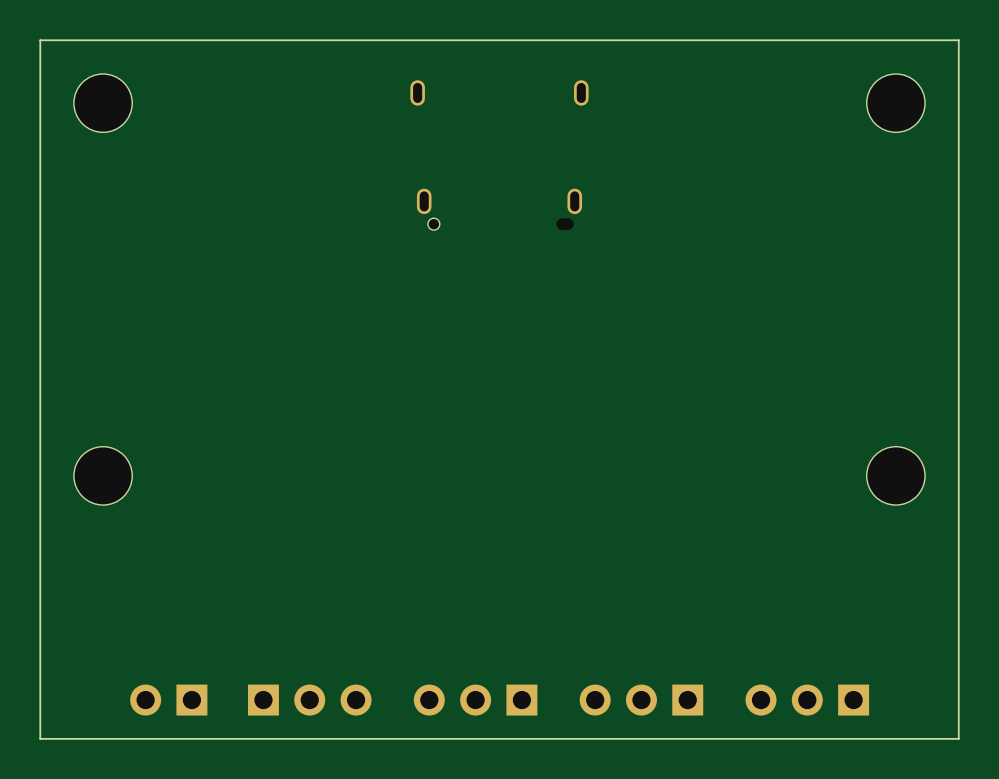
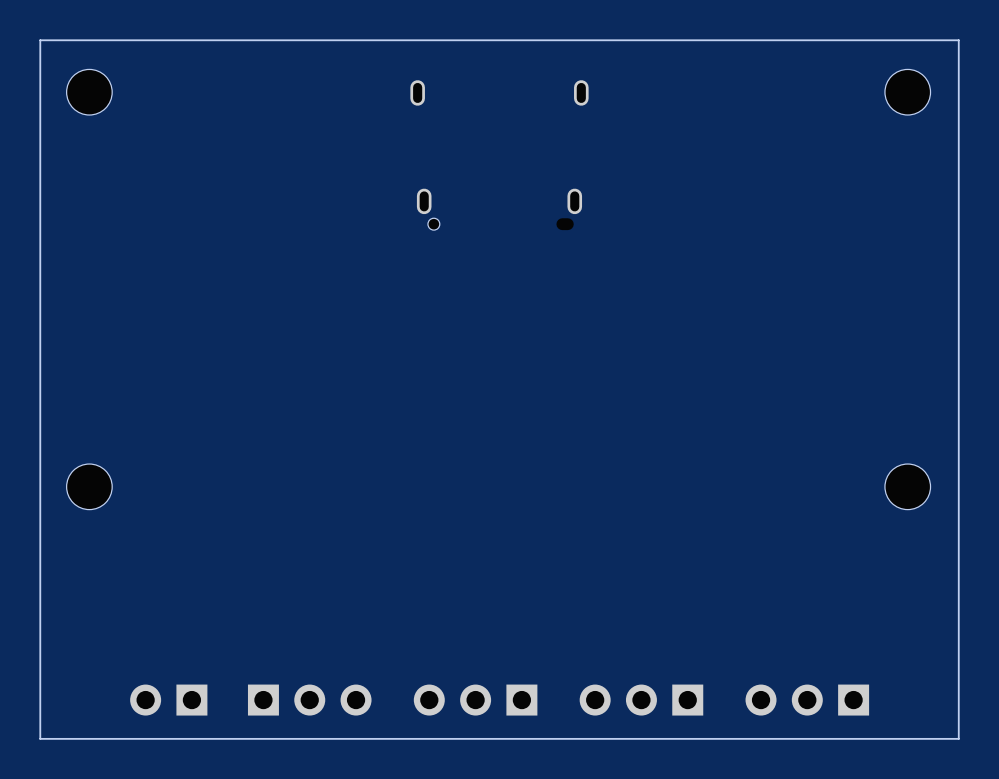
part footprint: [73, 74, 133, 133] -> [66, 69, 113, 116]
part footprint: [866, 74, 926, 133] -> [884, 69, 931, 116]
part footprint: [73, 446, 133, 506] -> [66, 464, 113, 510]
part footprint: [866, 446, 926, 506] -> [884, 464, 931, 510]

